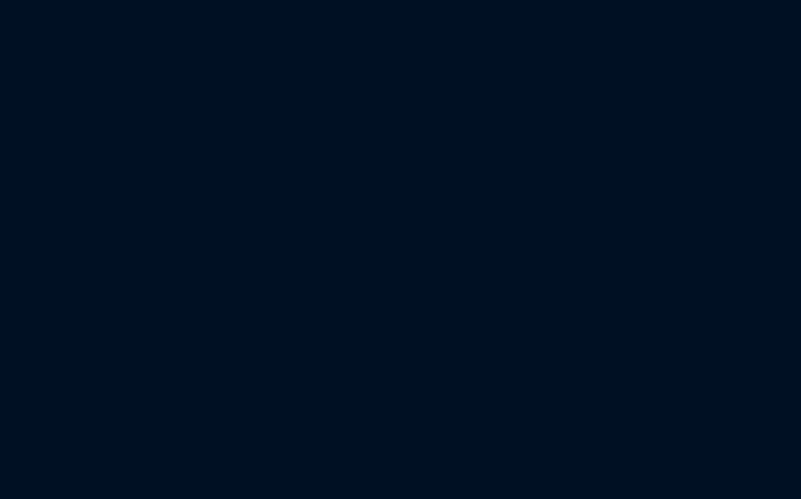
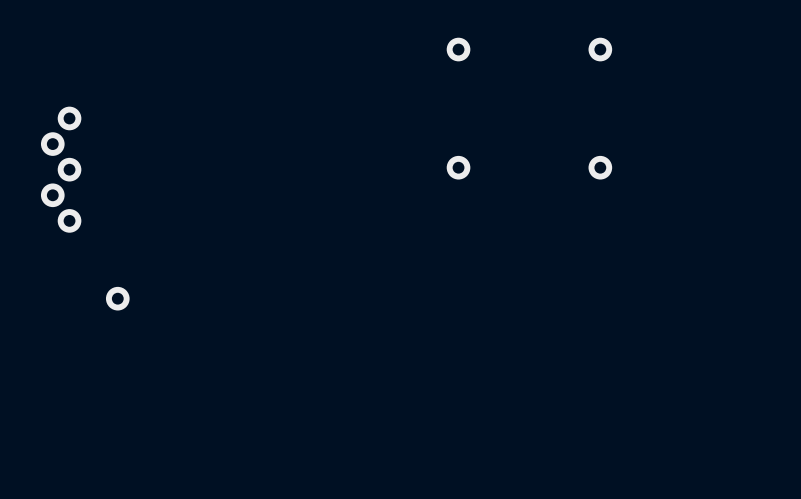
via: none -> (458, 49)
via: none -> (600, 49)
via: none -> (69, 118)
via: none -> (52, 144)
via: none -> (458, 167)
via: none -> (600, 167)
via: none -> (69, 169)
via: none -> (52, 195)
via: none -> (69, 220)
via: none -> (117, 298)

